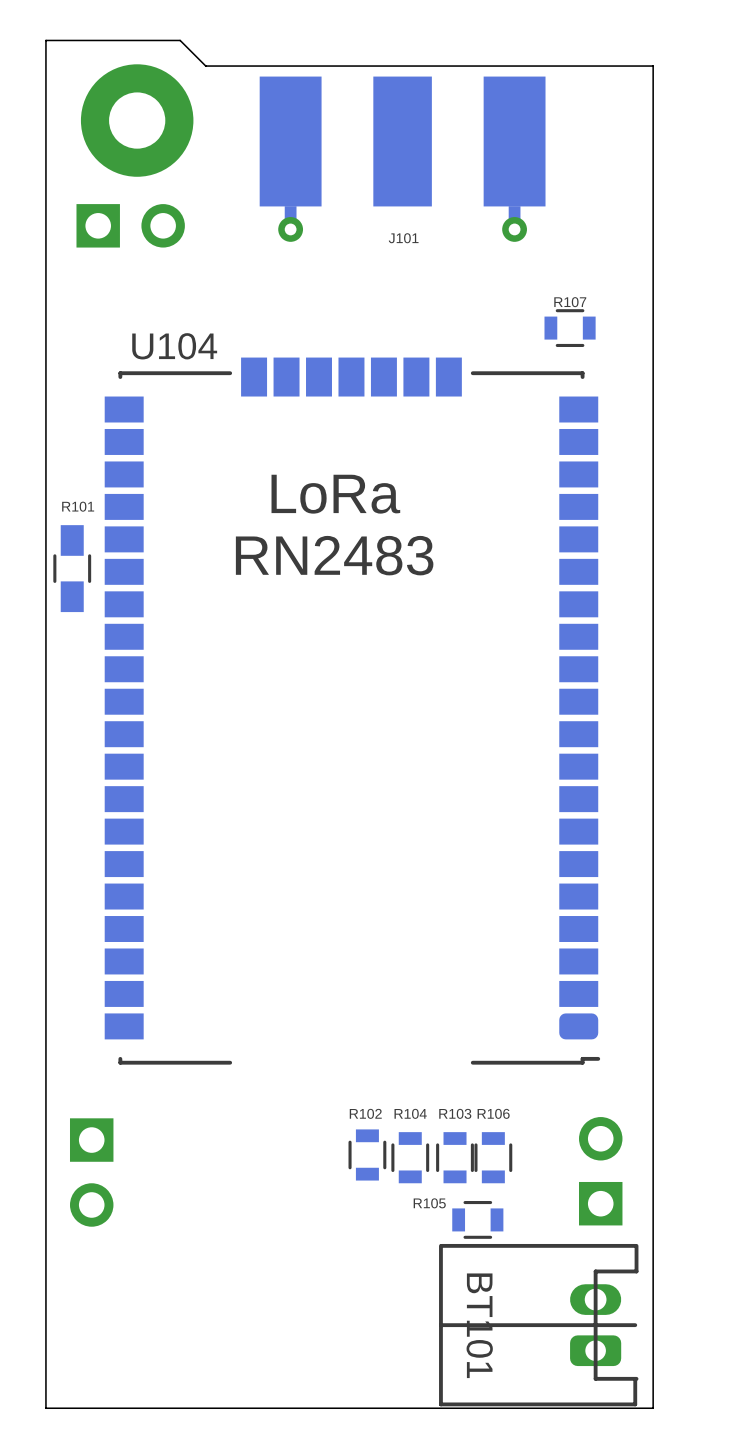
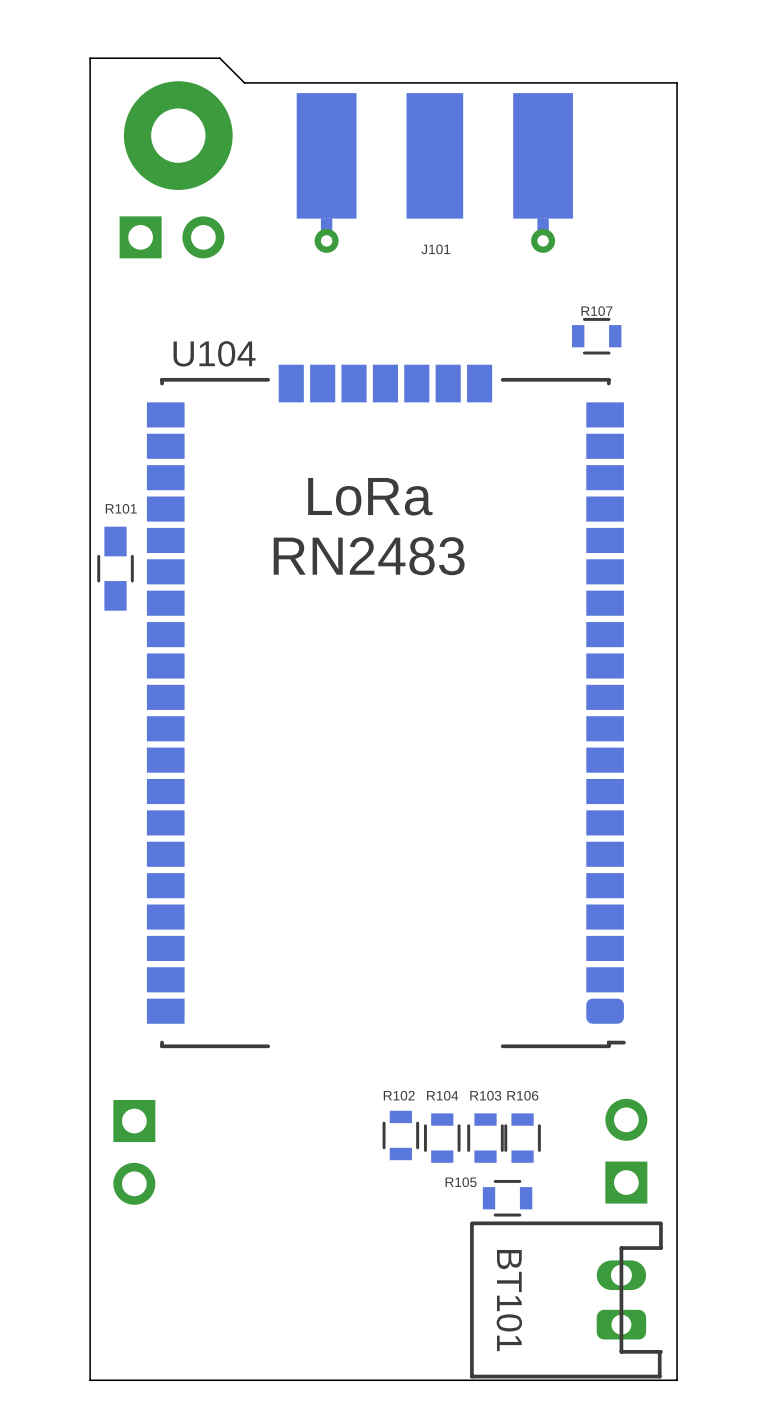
BT101 footprint: [439, 1243, 639, 1407] -> [470, 1221, 663, 1379]

